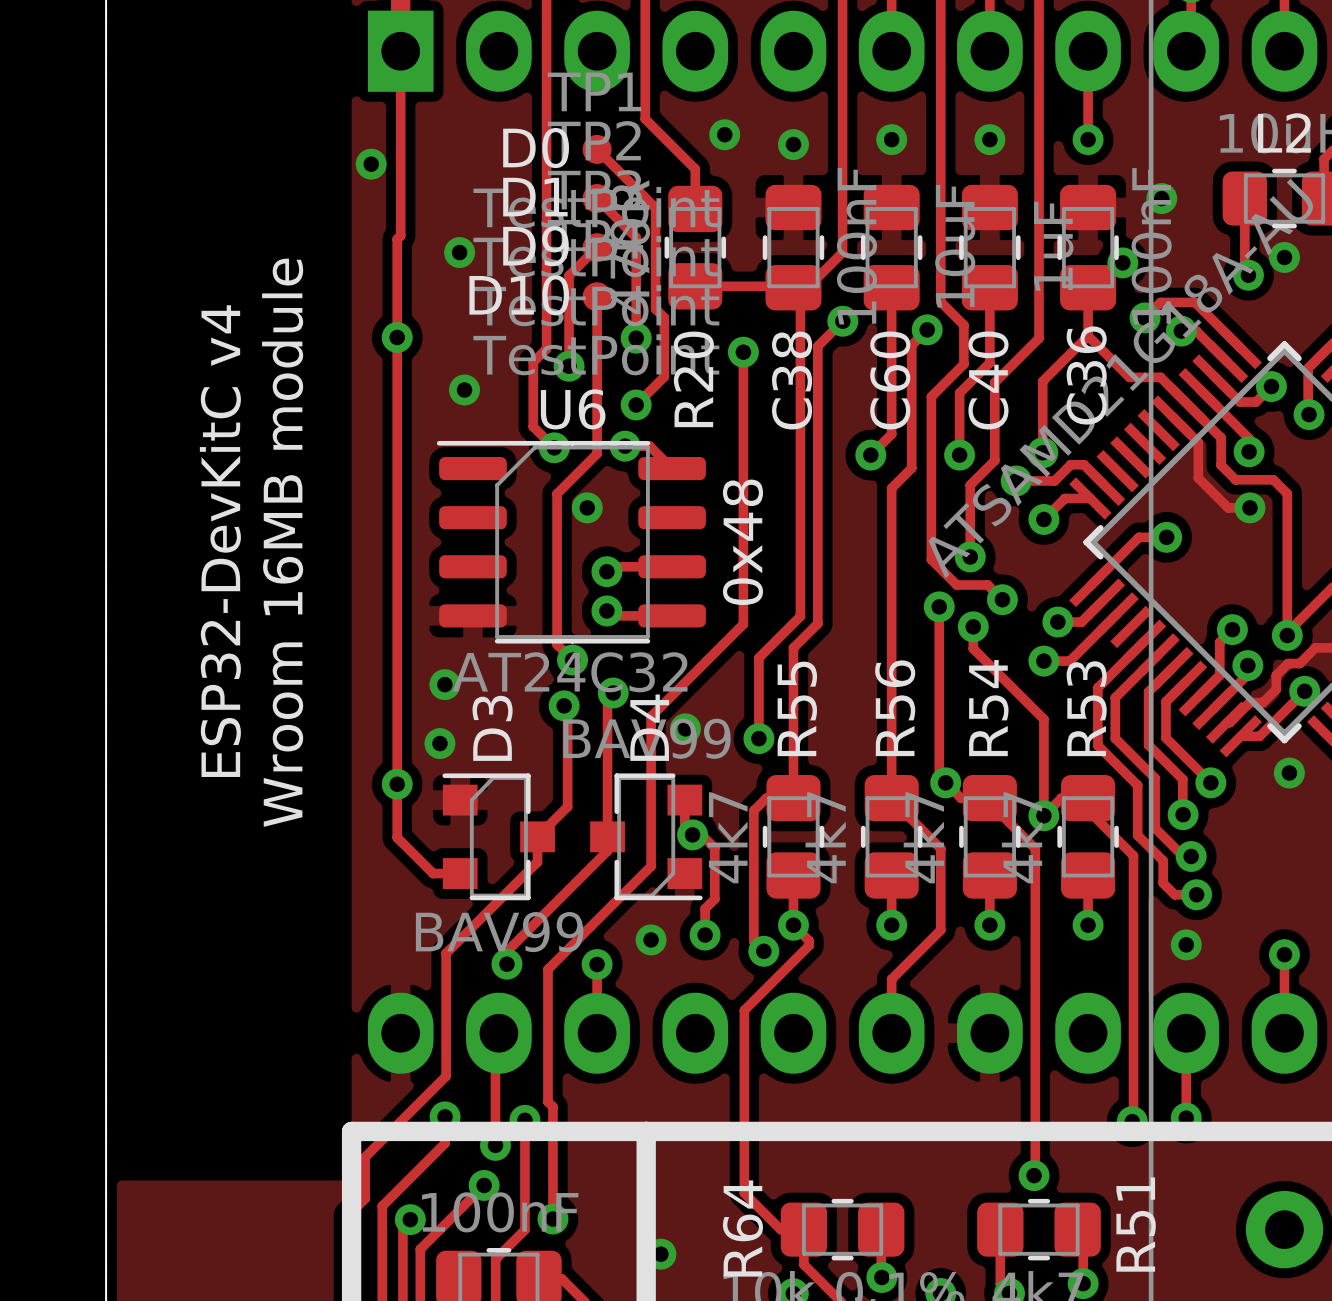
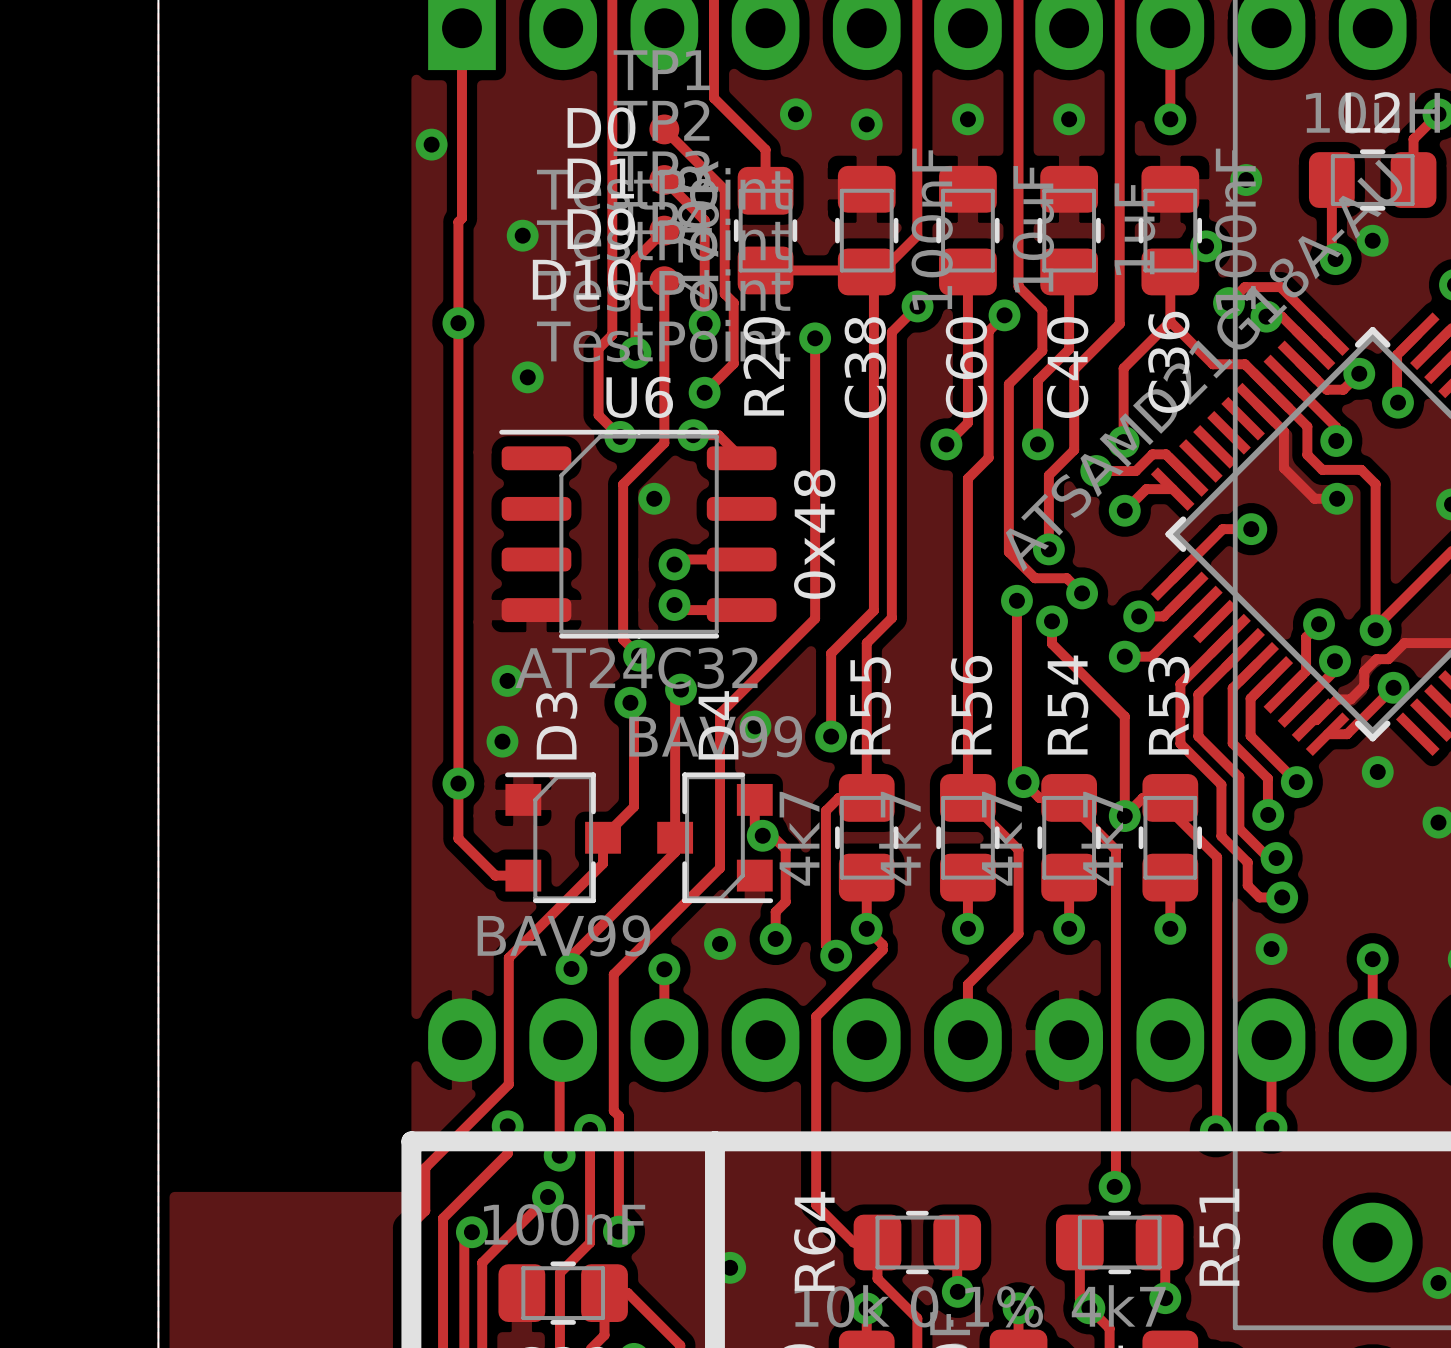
text: ESP32-DevKitC v4 (220, 541) -> none
text: Wroom 16MB module (282, 542) -> none

